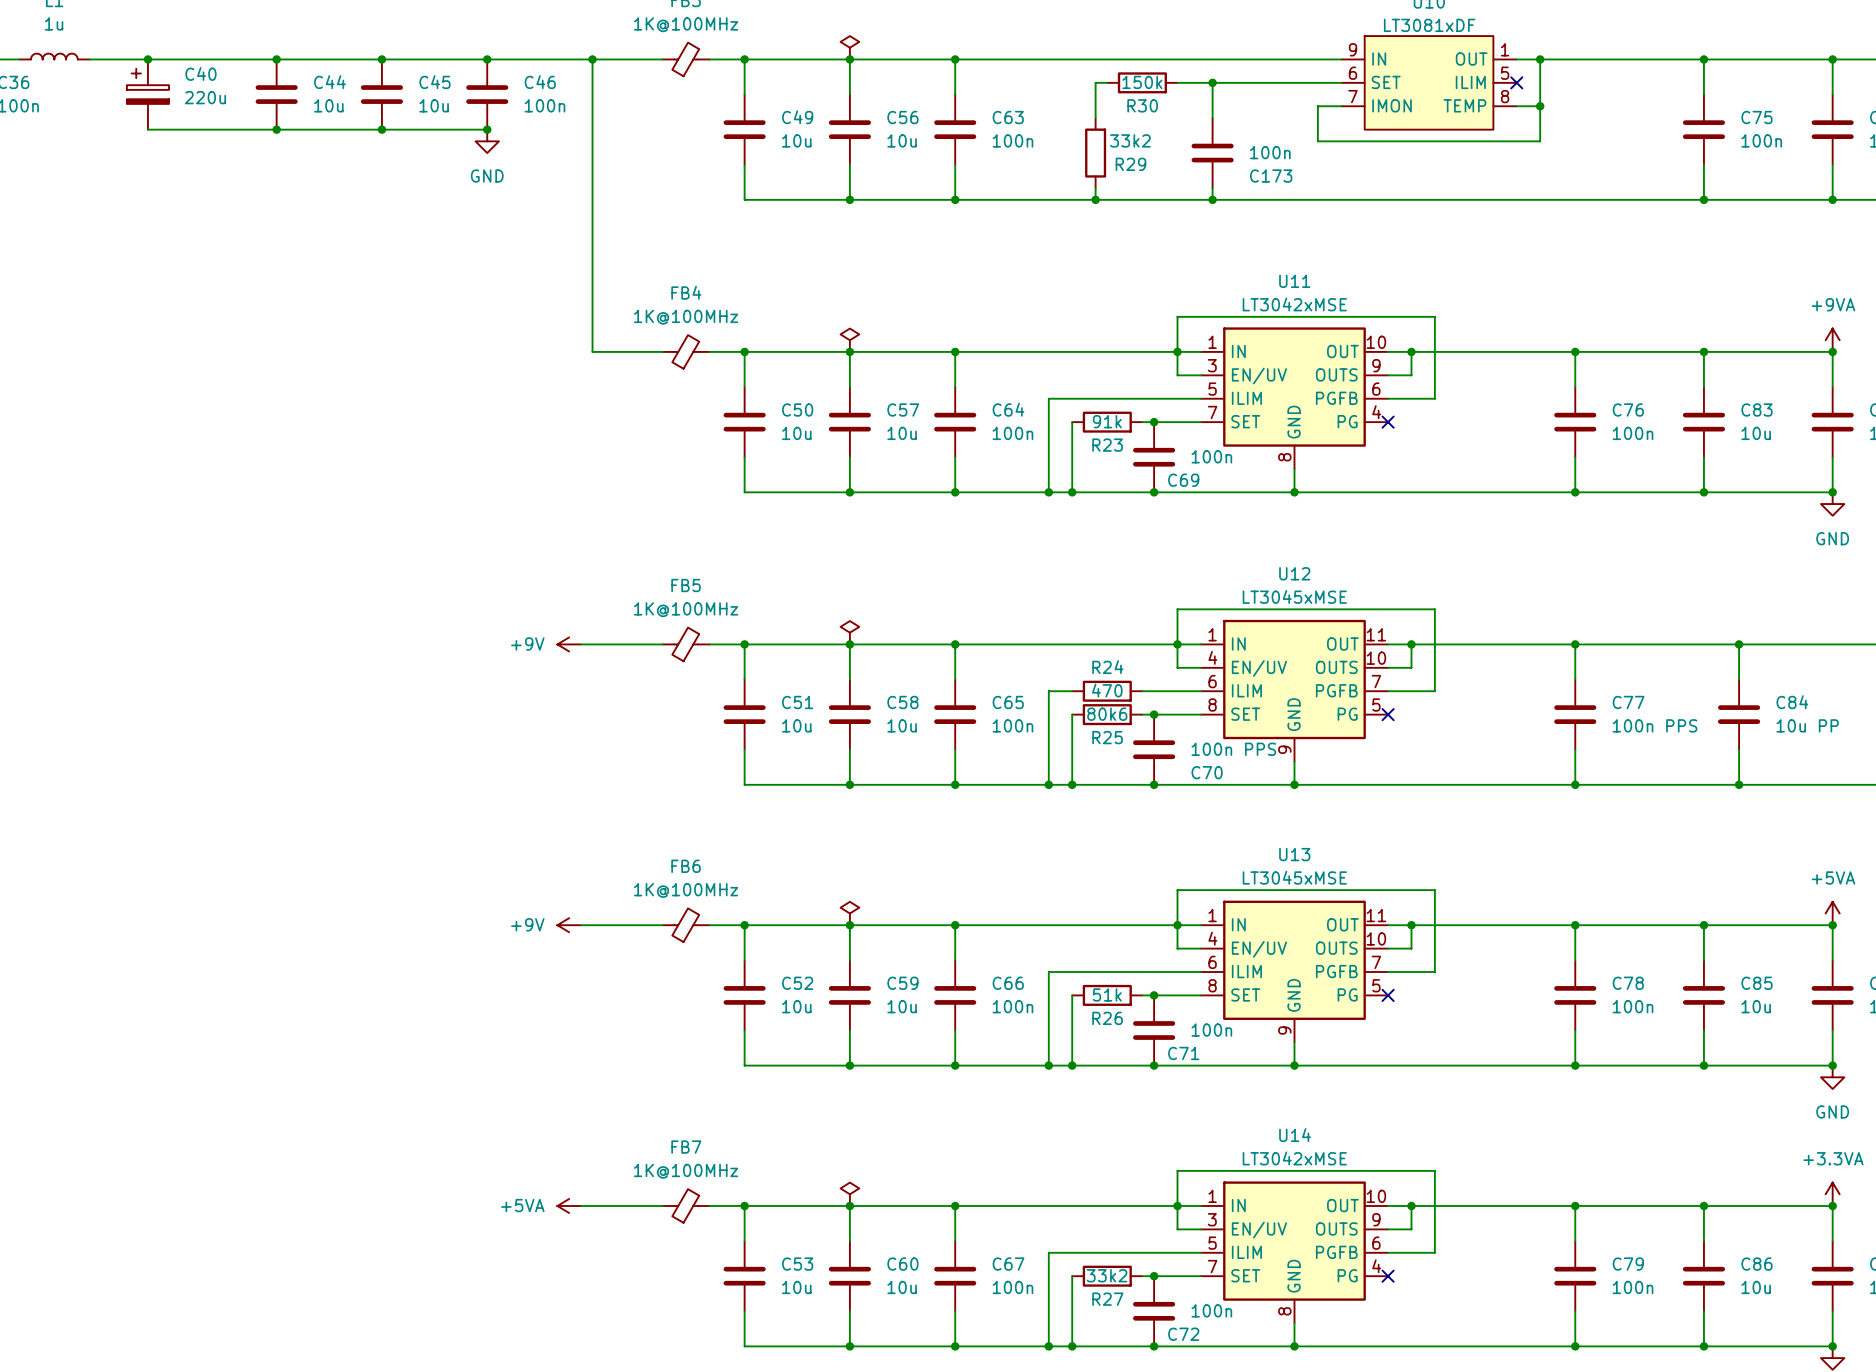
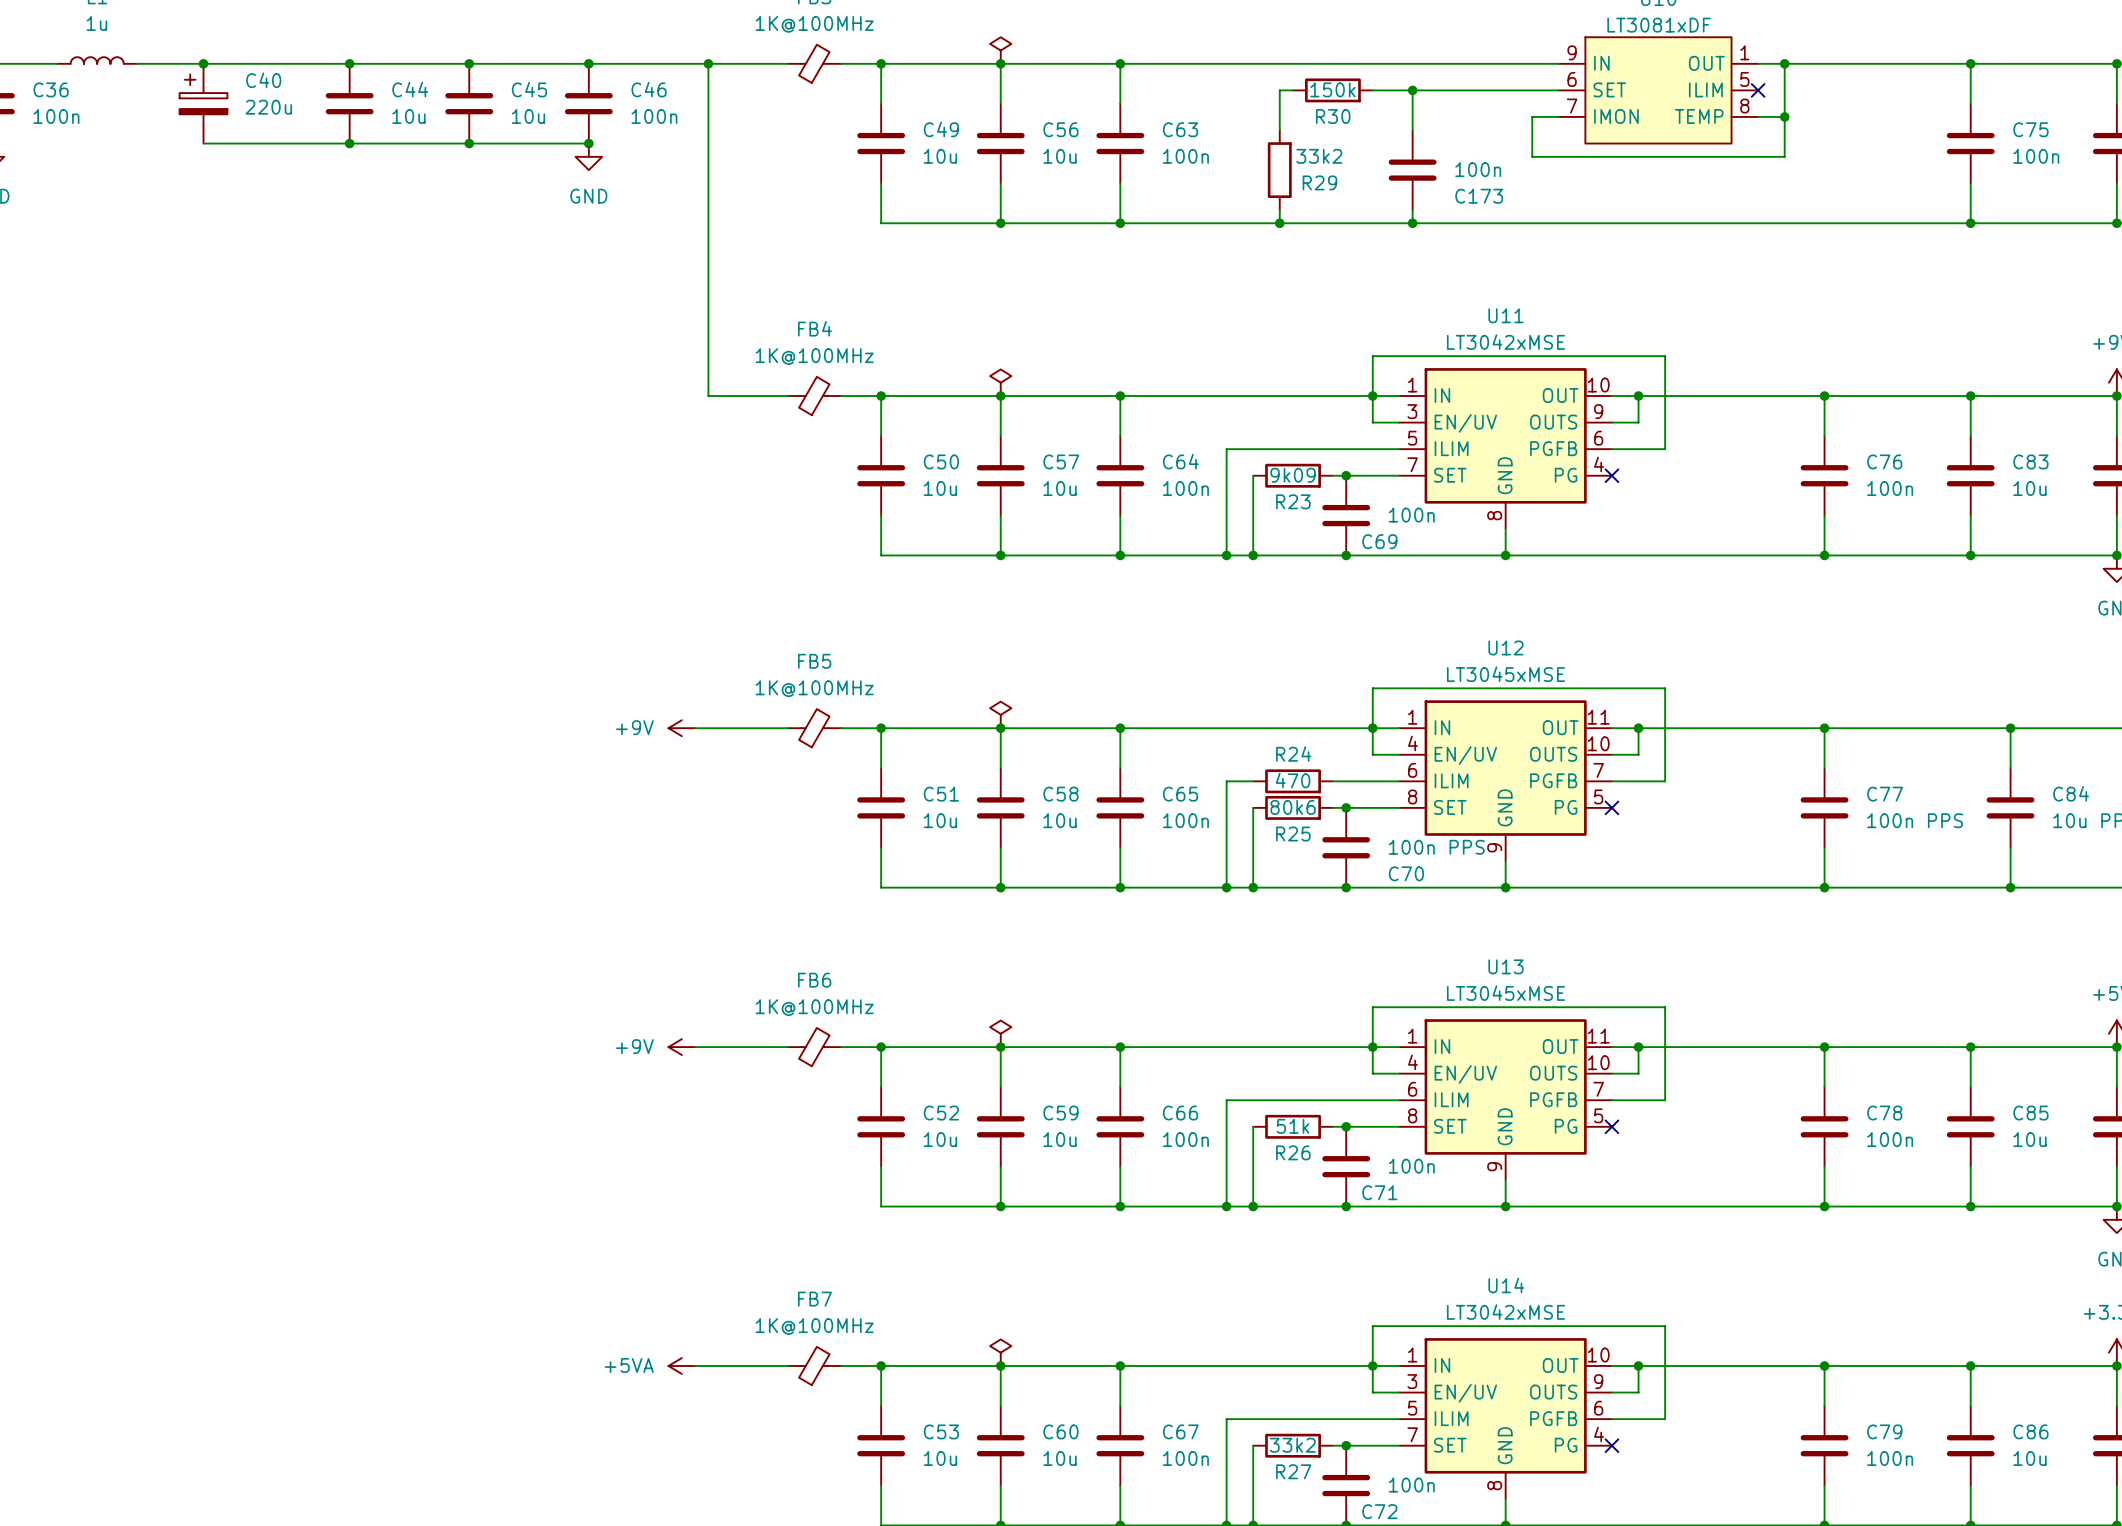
R23 value: 91k (1107, 421) -> 9k09 (1293, 475)

